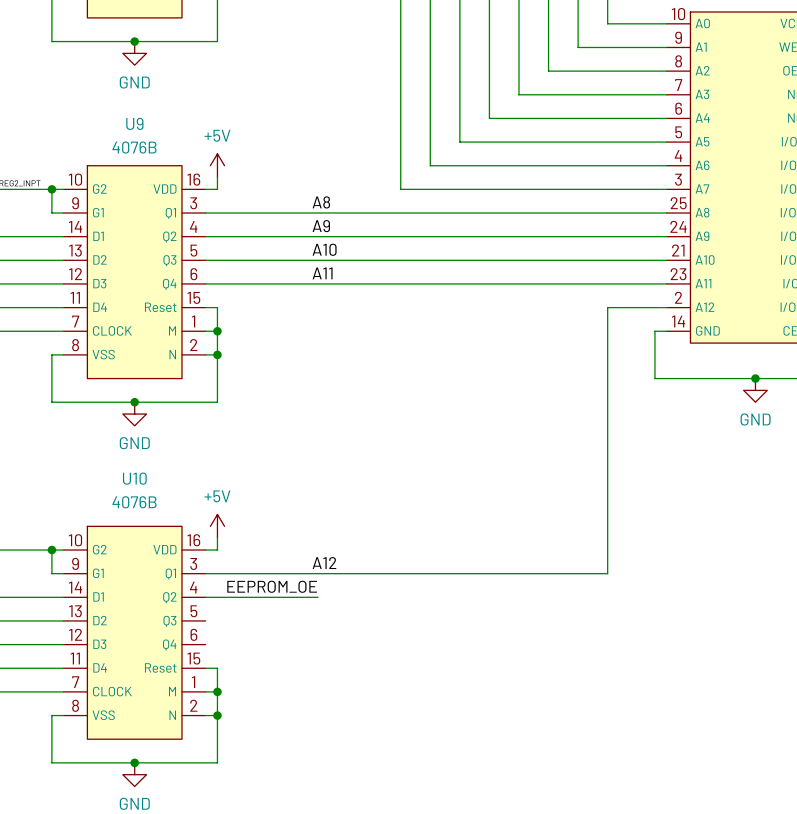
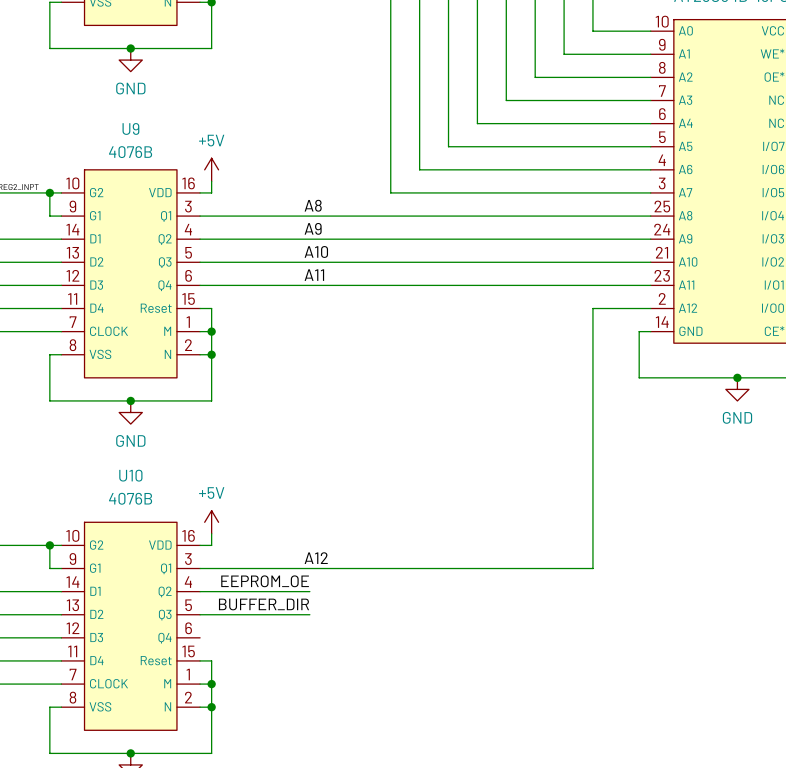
label: none -> BUFFER_DIR (264, 604)
wire: none -> (200, 614) (309, 614)

